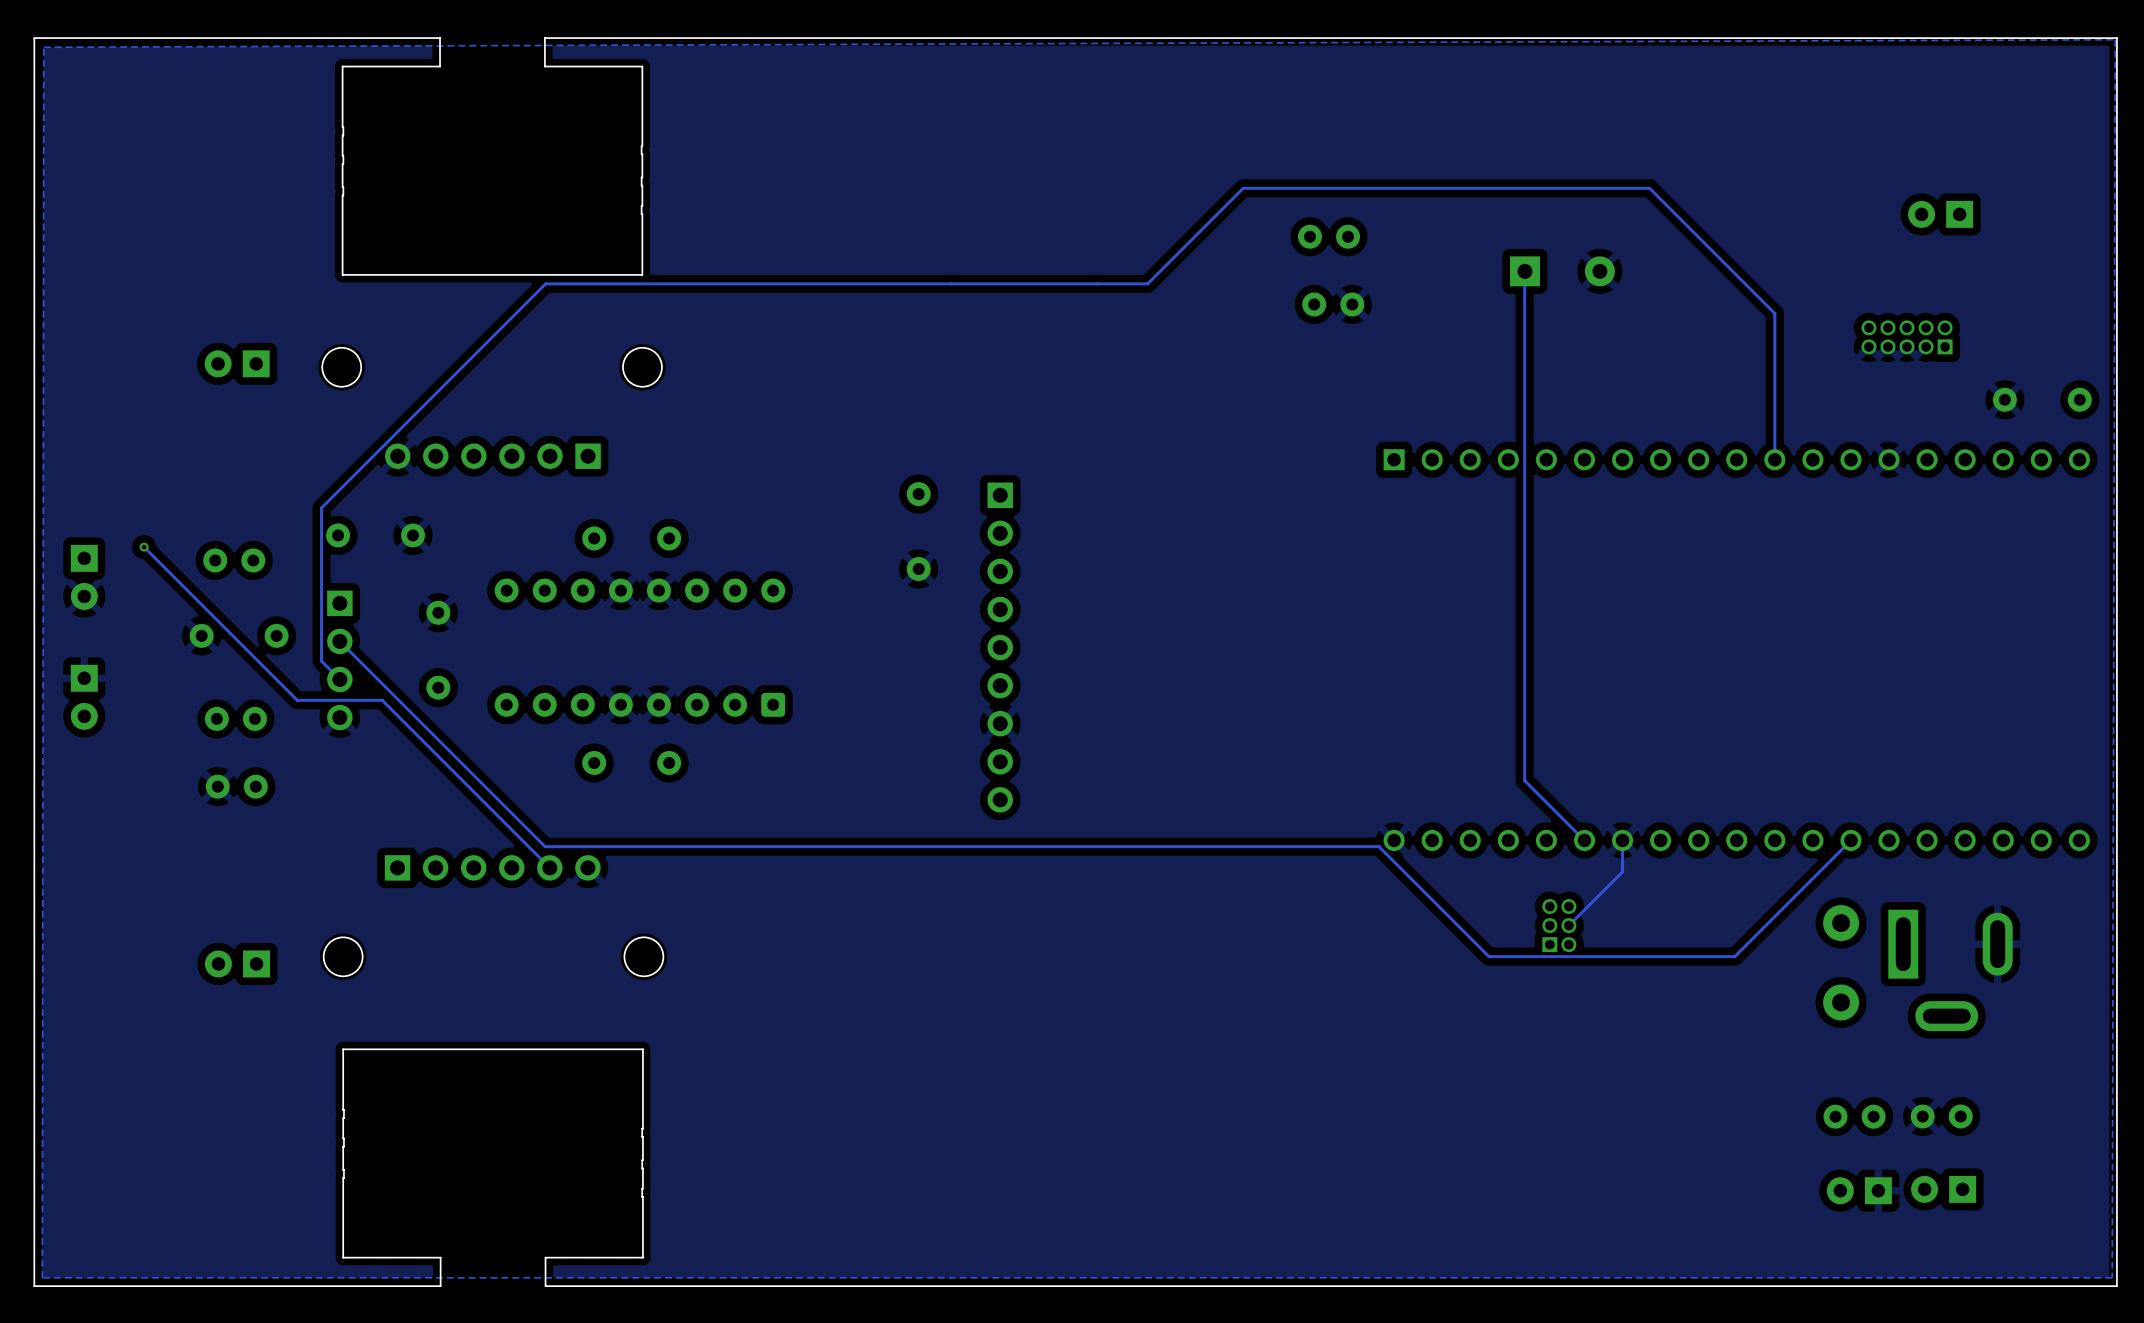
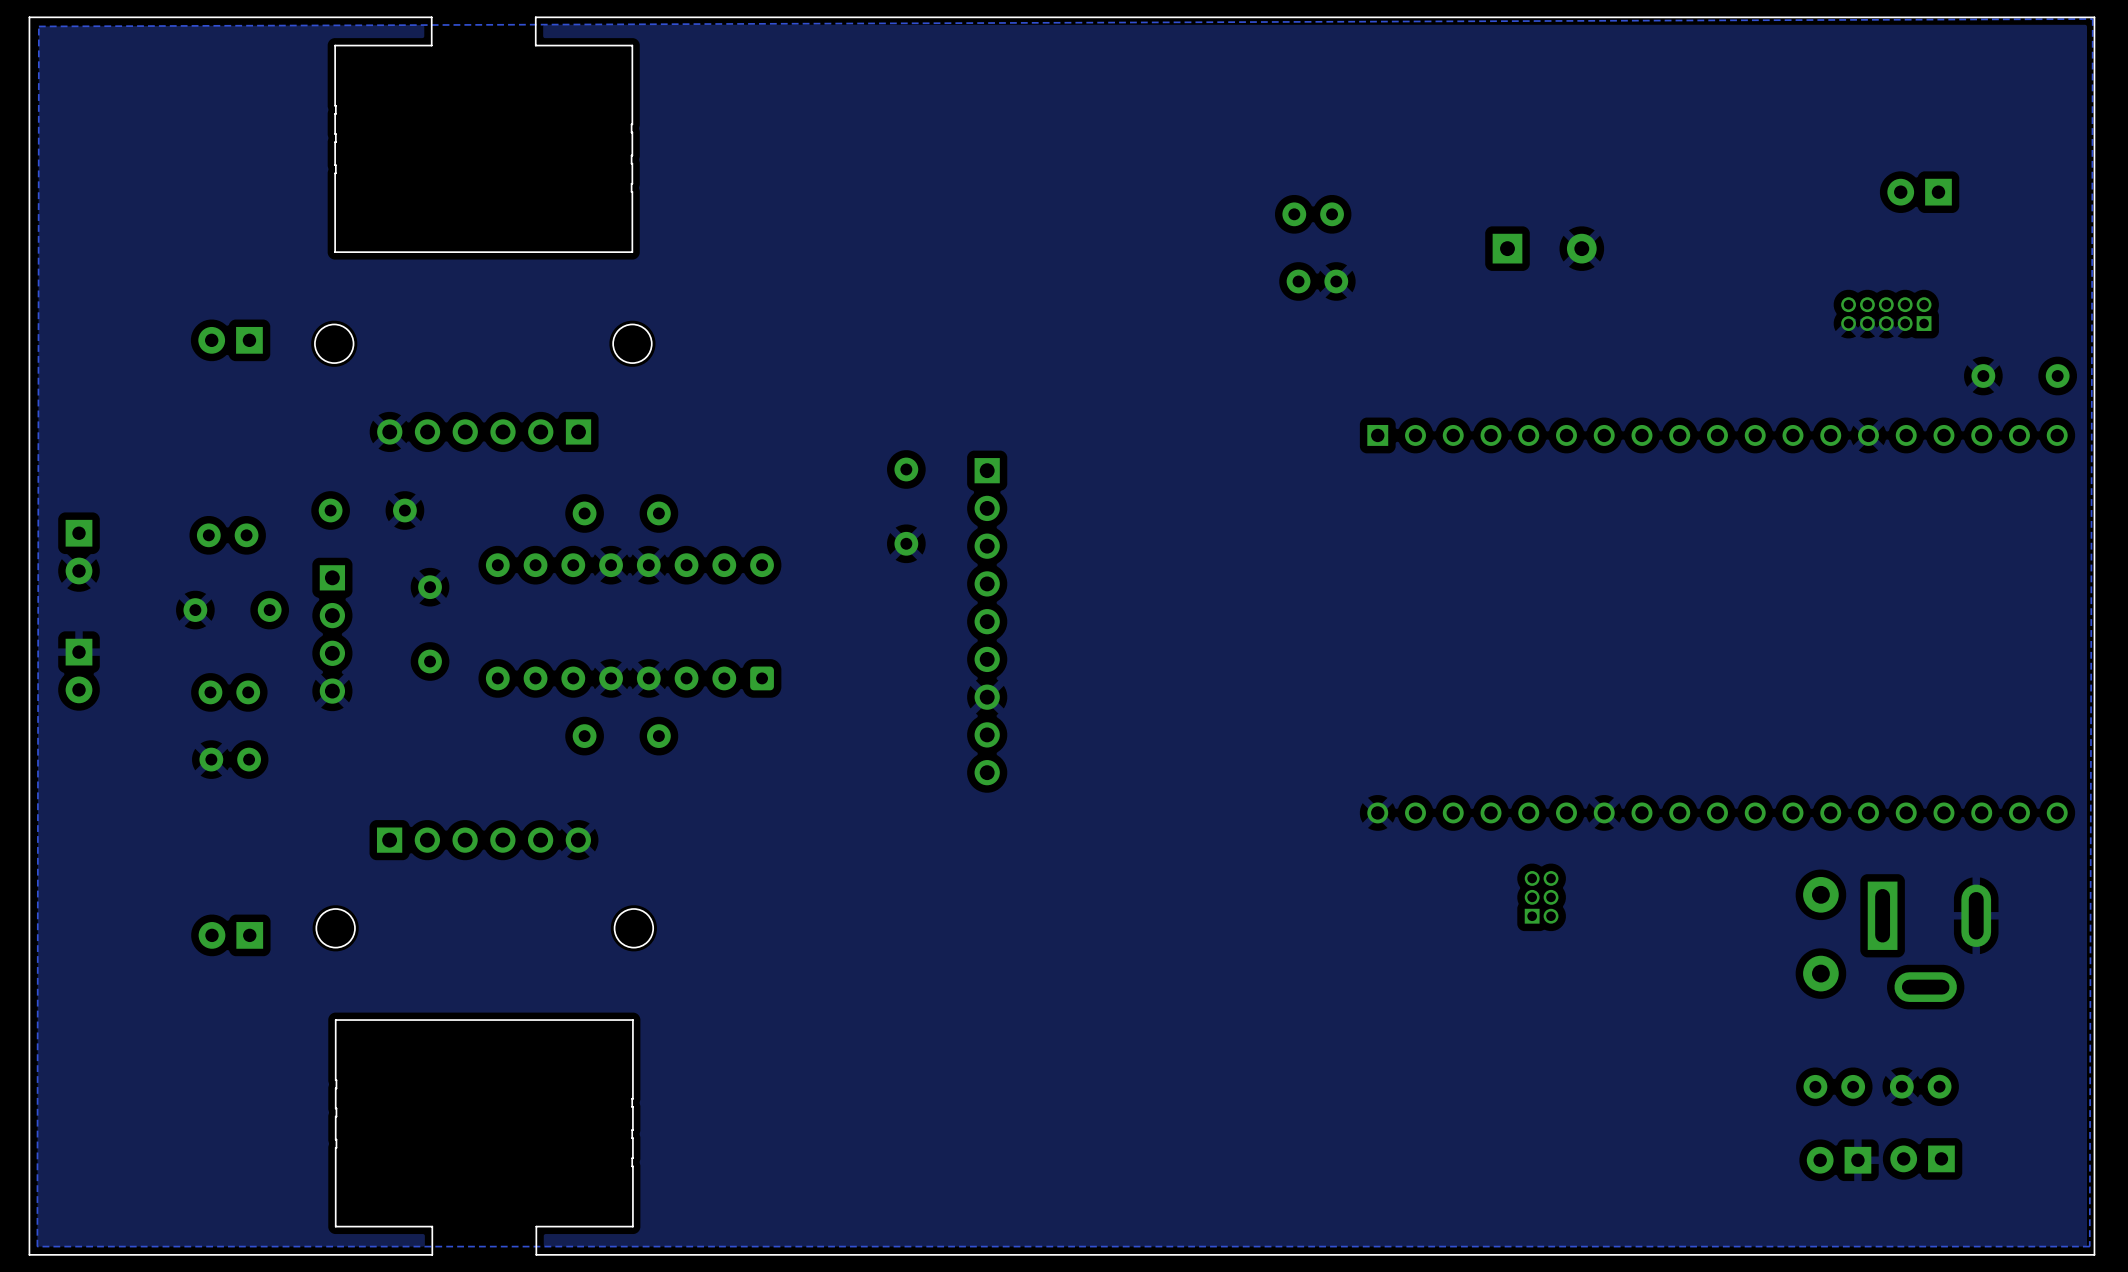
track: (1524, 271) (1524, 780) (1584, 840) -> none
track: (1774, 459) (1774, 313) (1649, 188) (1243, 188) (1147, 283) (545, 283) (321, 507) (321, 661) (339, 679) -> none
track: (144, 547) (297, 700) (382, 700) (549, 867) -> none
via: (144, 547) -> none
track: (339, 641) (545, 846) (1379, 846) (1489, 956) (1734, 956) (1850, 840) -> none
track: (1622, 840) (1622, 871) (1568, 925) -> none

